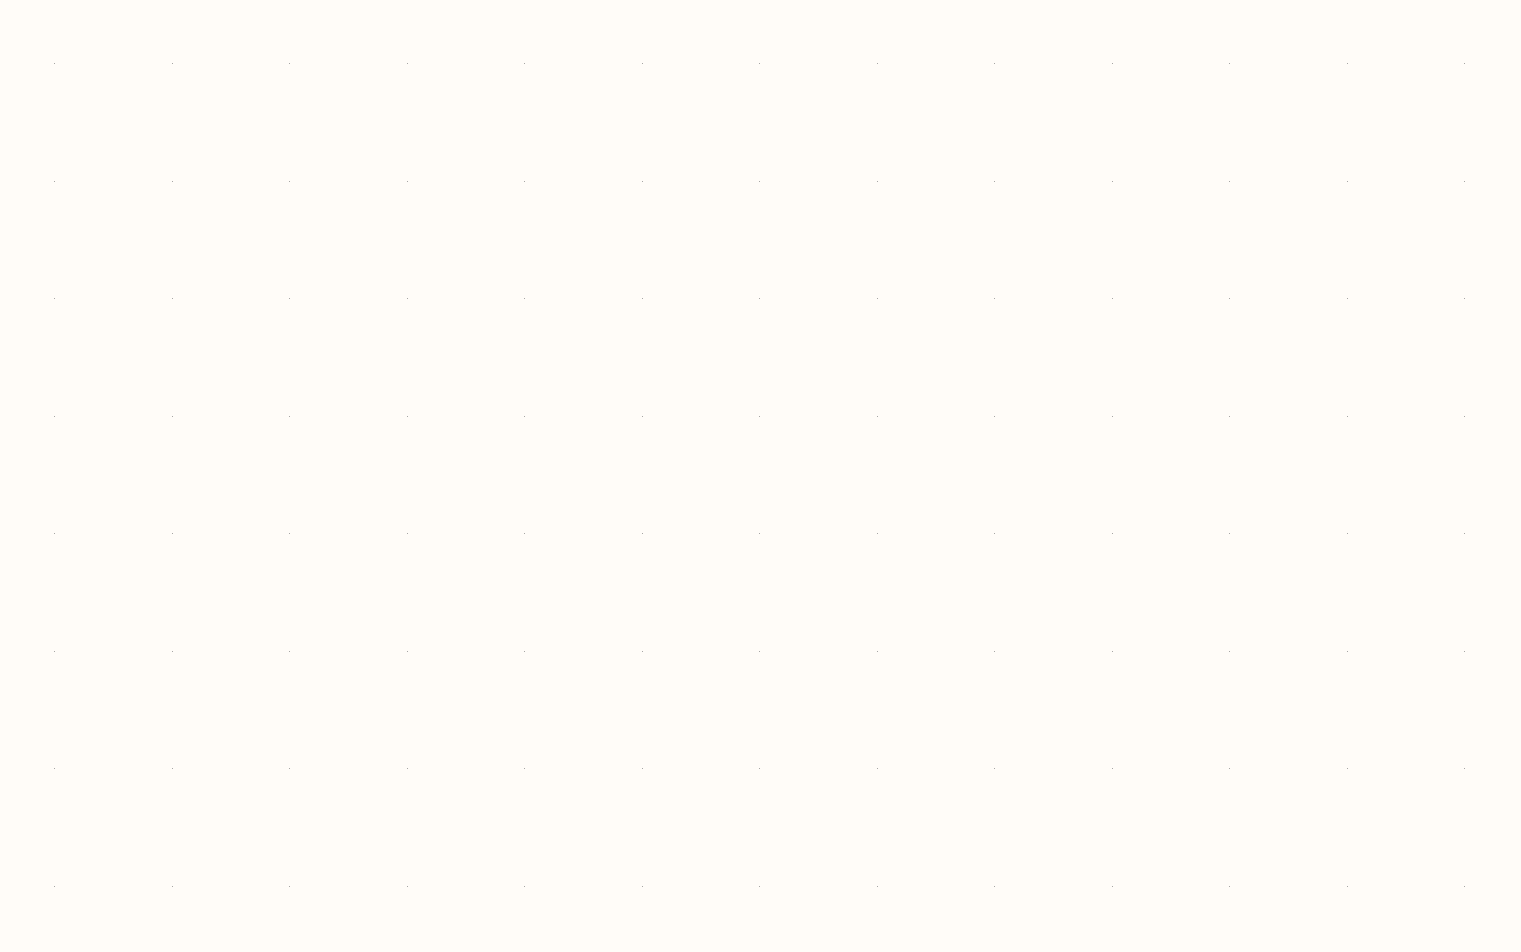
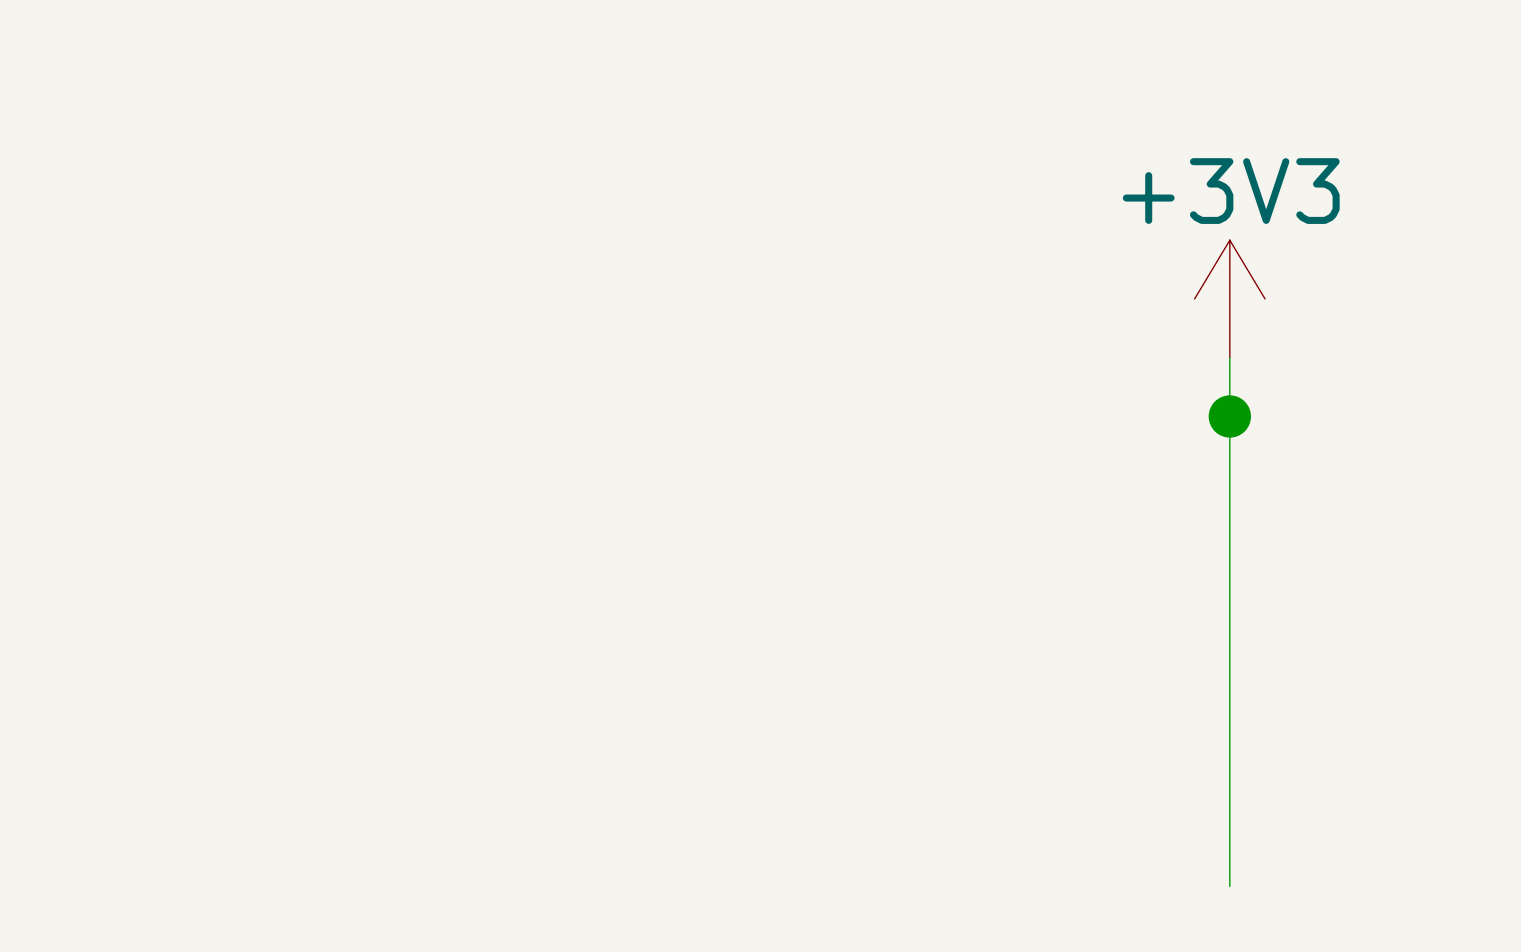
power symbol: none -> +3V3 (1229, 298)
wire: none -> (1229, 357) (1229, 886)
junction: none -> (1229, 416)

